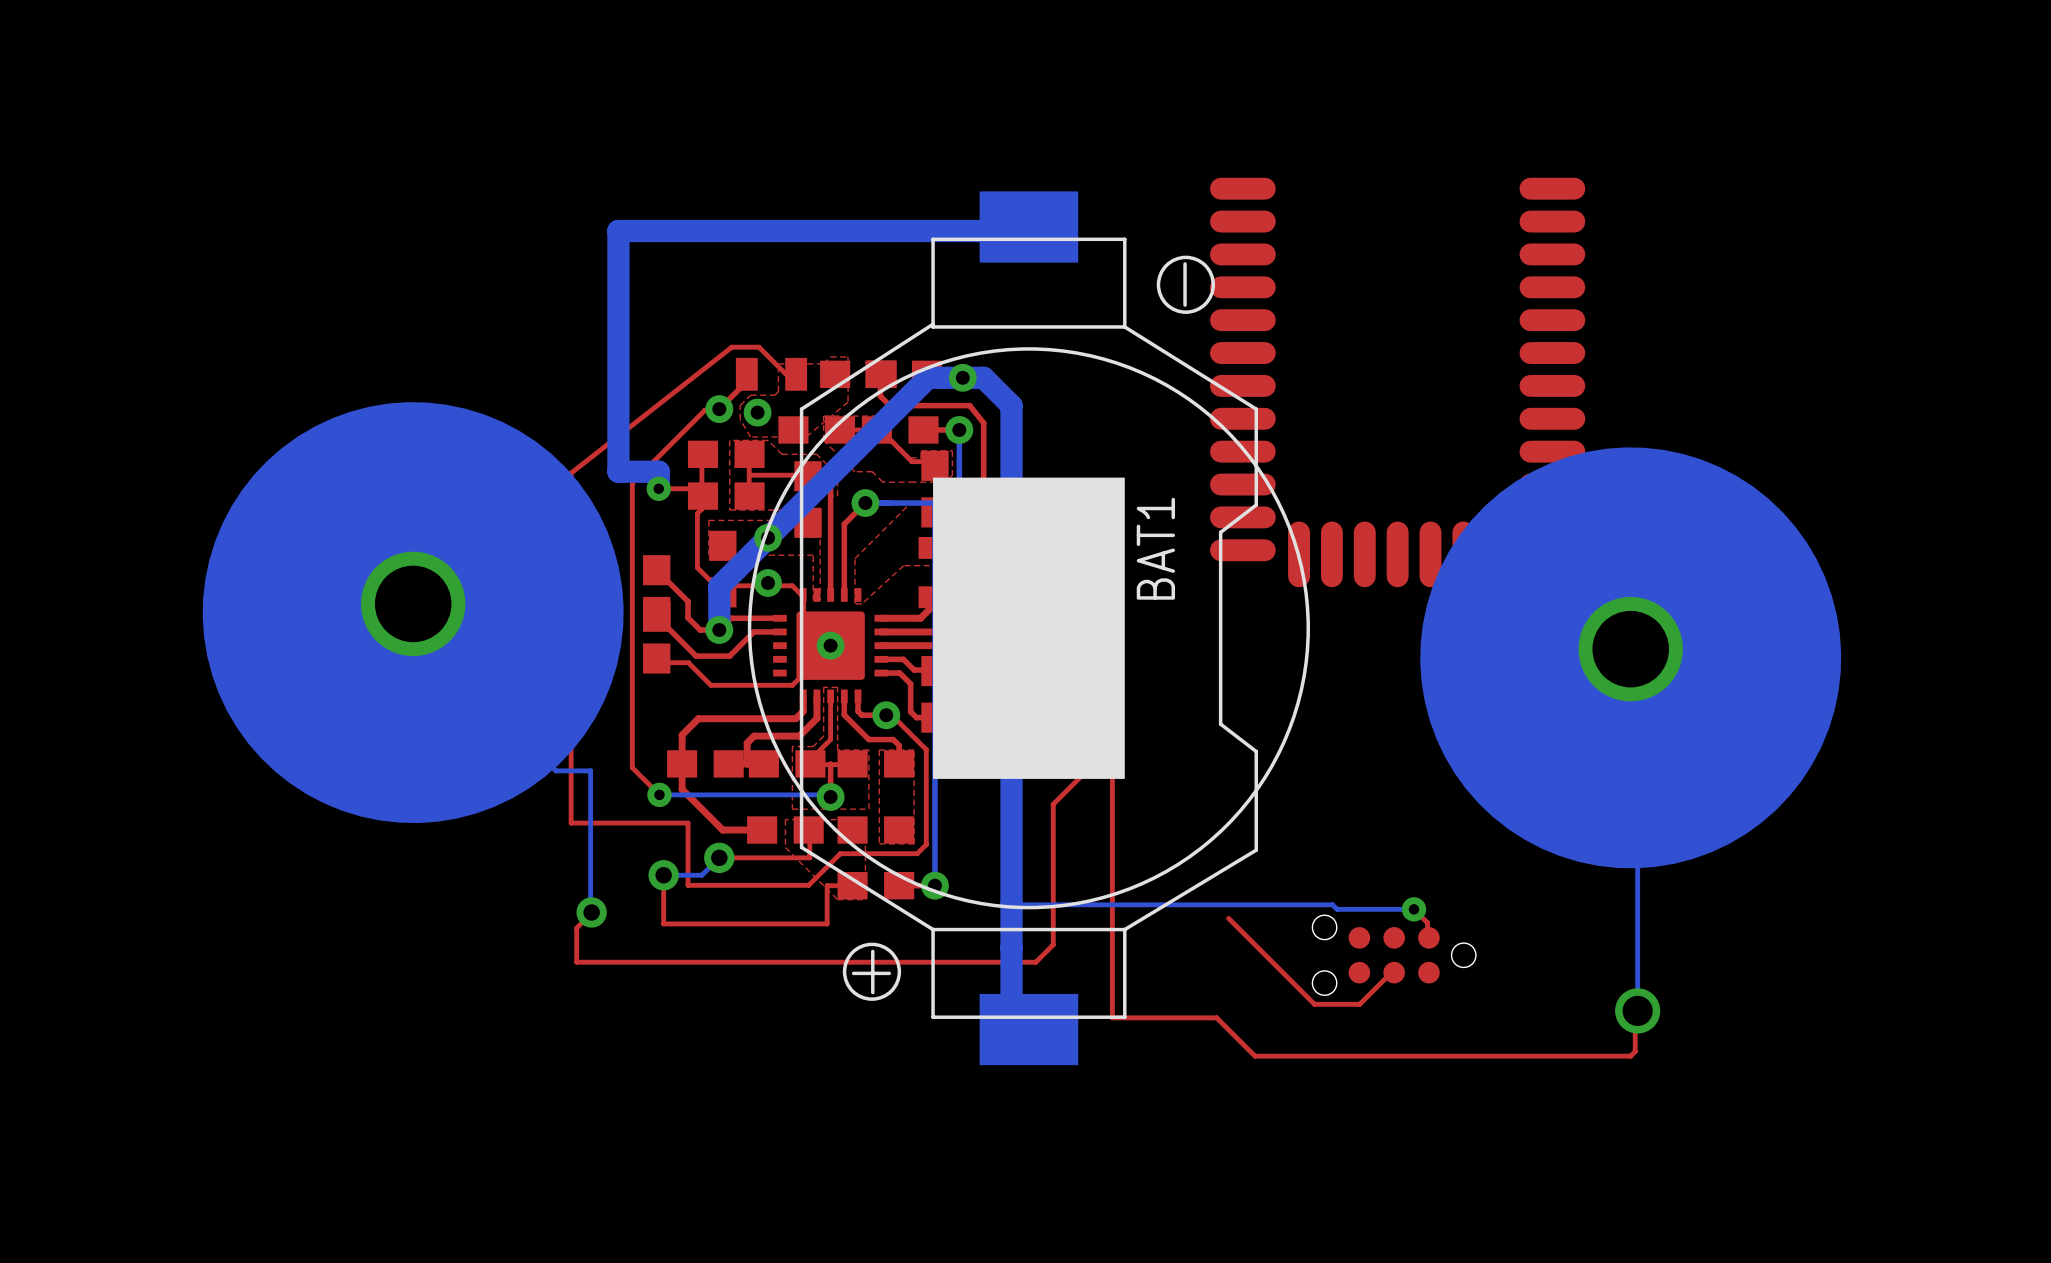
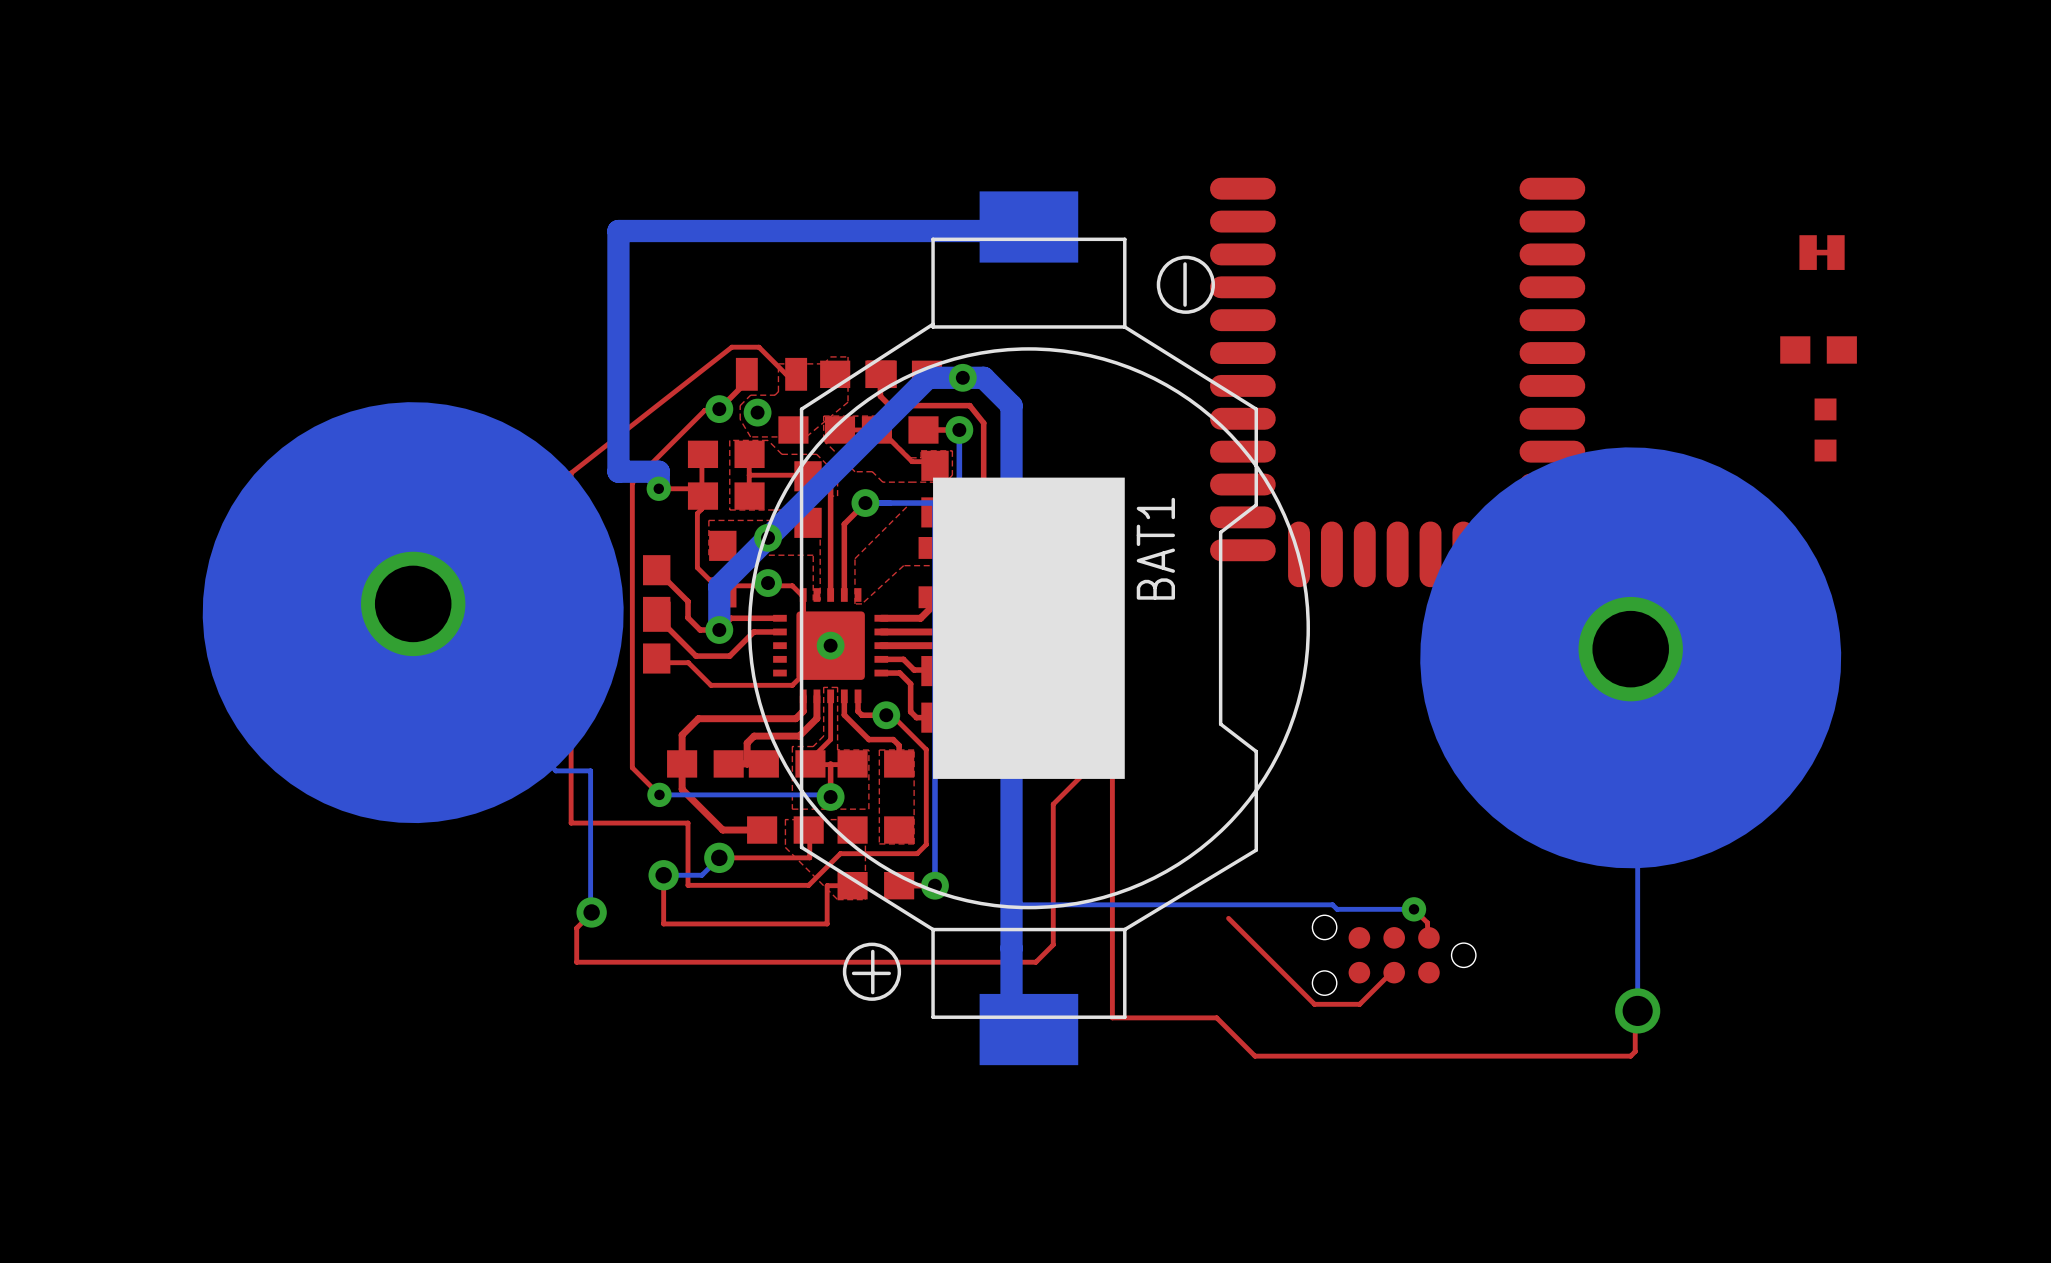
part: none -> (1822, 252)
part: none -> (1818, 349)
part: none -> (1825, 429)

